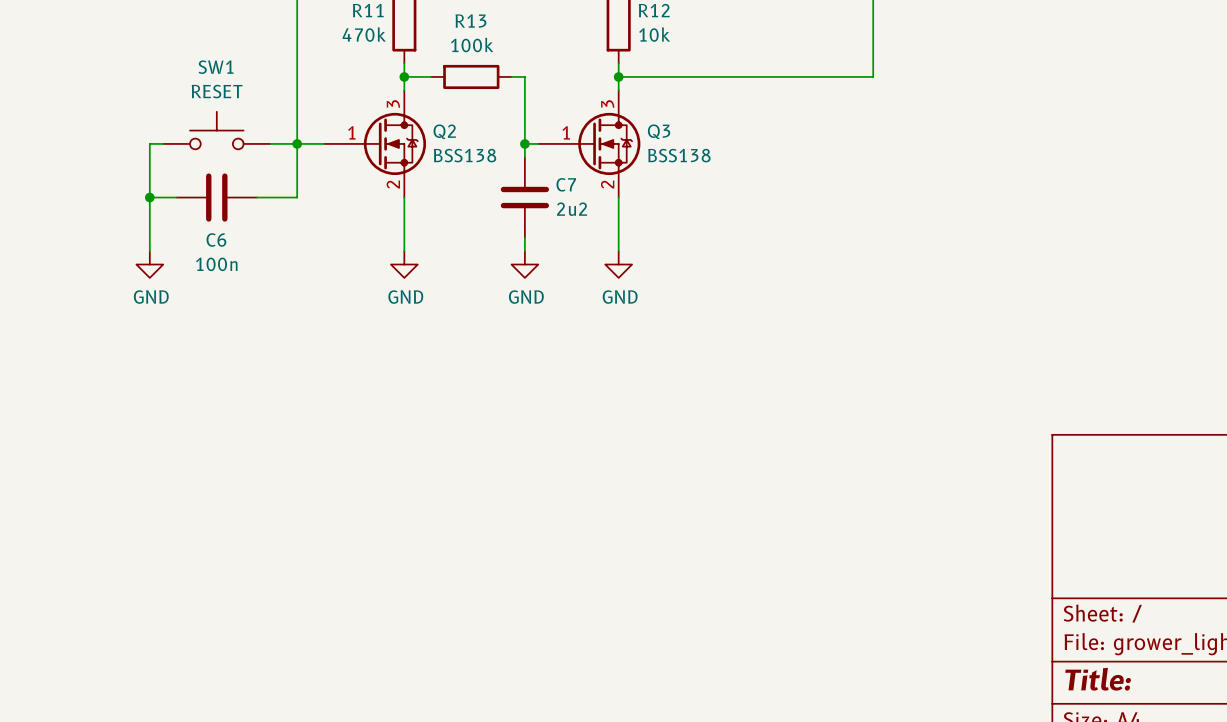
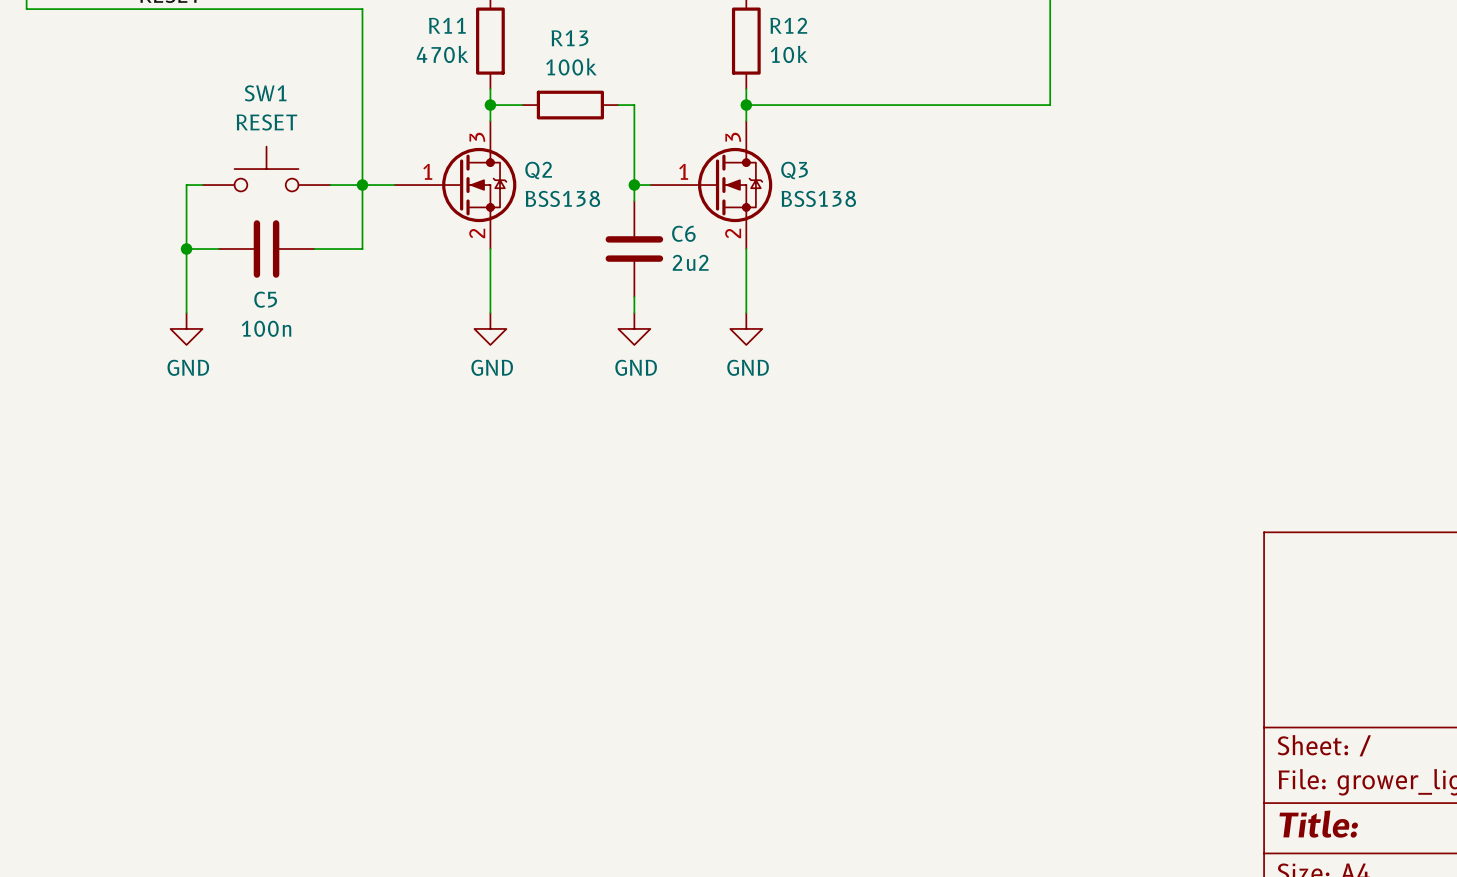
C7 name: C7 (566, 184) -> C6 (683, 233)
C6 name: C6 (216, 239) -> C5 (265, 299)

